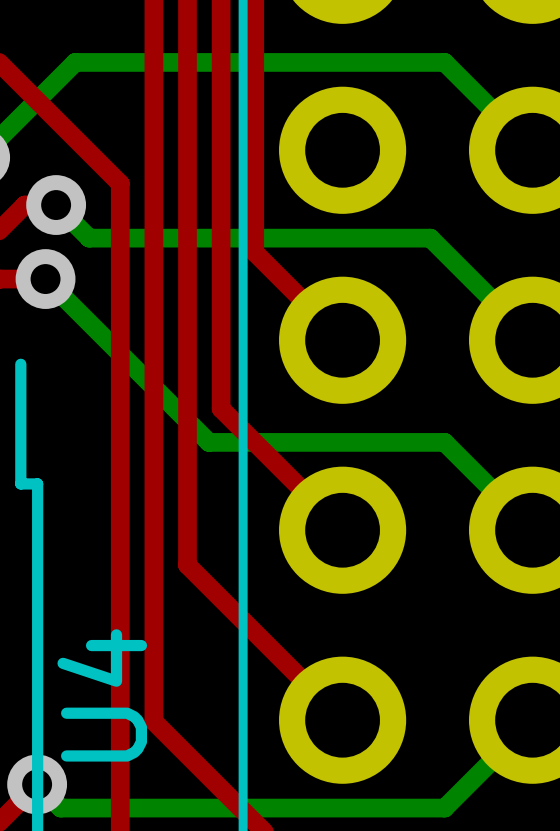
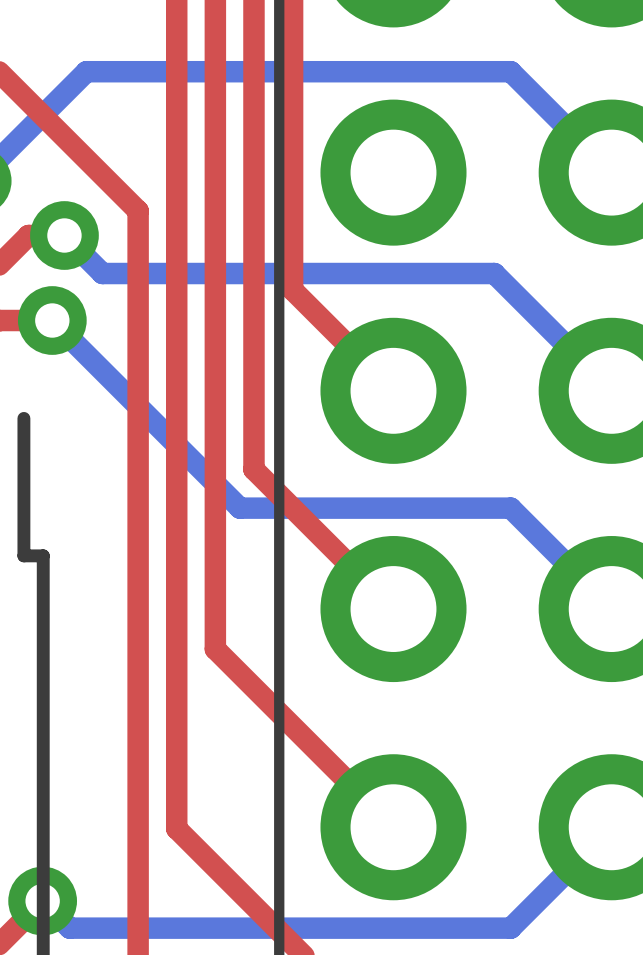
U4 name: U4 (102, 695) -> none

